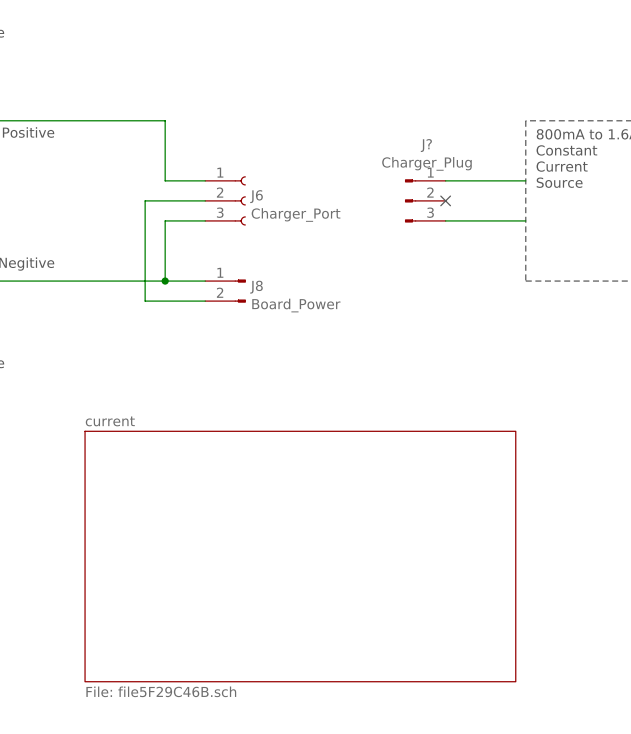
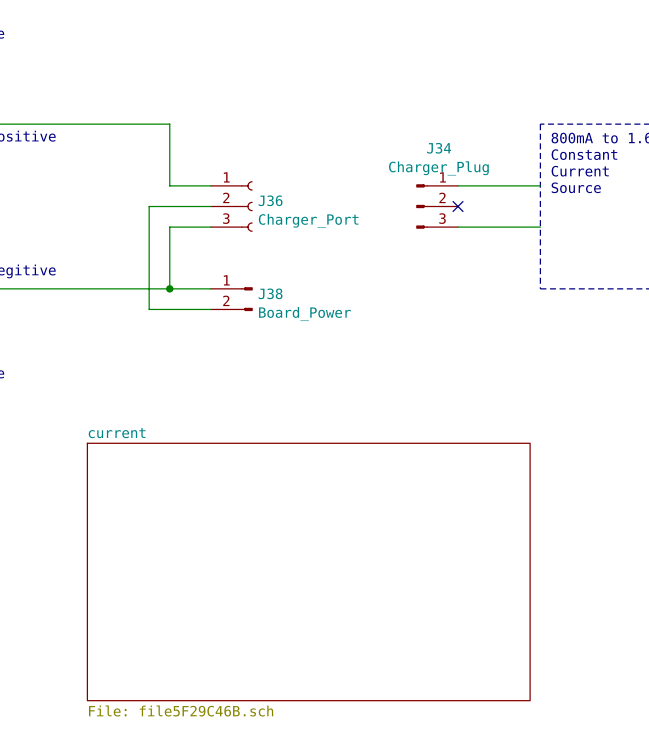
J? name: J? (426, 145) -> J34 (439, 148)
J6 name: J6 (256, 196) -> J36 (270, 200)
J8 name: J8 (256, 287) -> J38 (270, 293)

